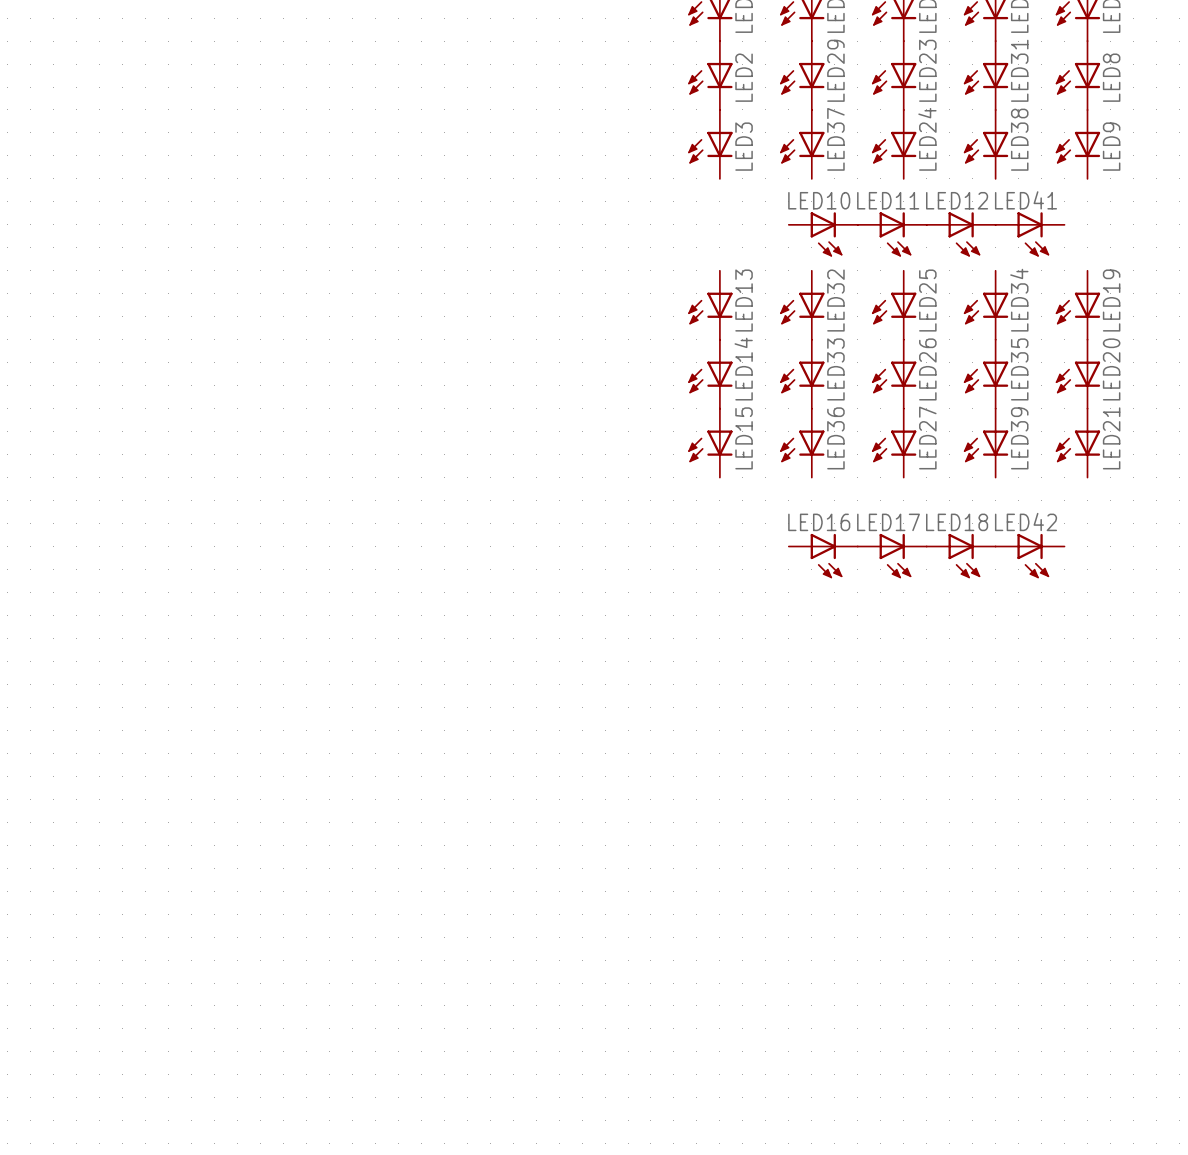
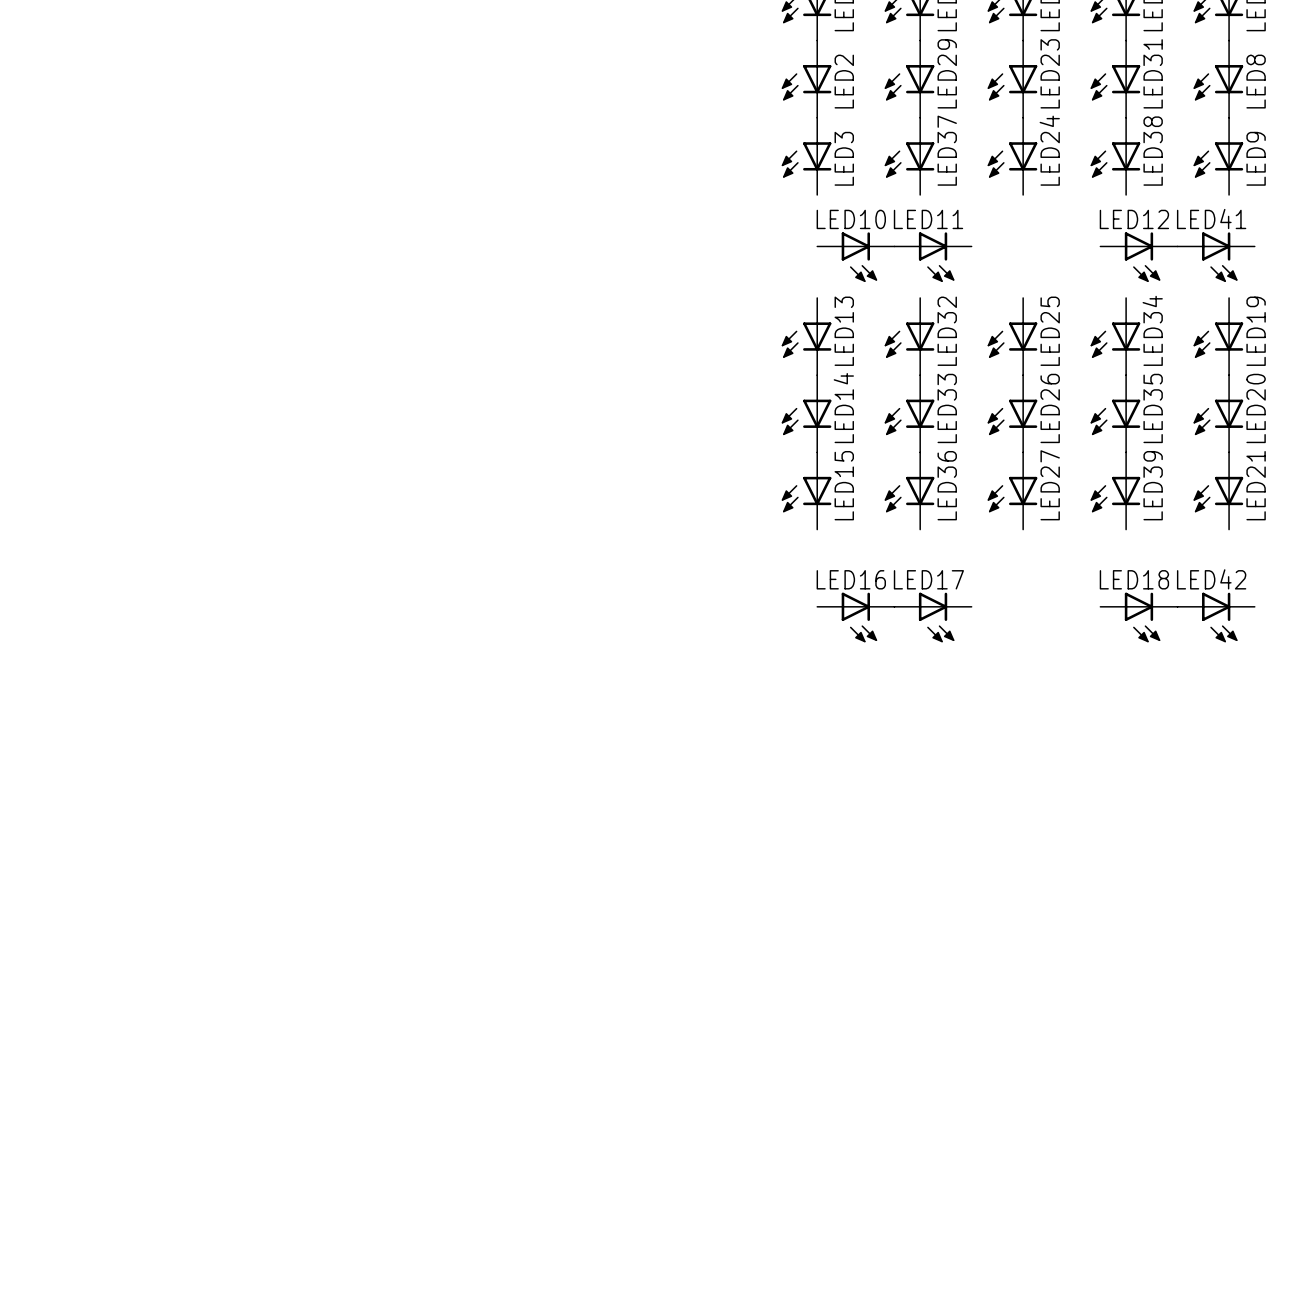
LED10 name: LED10 (819, 200) -> LED11 (928, 219)
LED10: none -> (855, 257)
LED11: (892, 234) -> none
LED12 position: (961, 234) -> (1138, 257)
LED41 position: (1030, 234) -> (1216, 257)
LED16 name: LED16 (819, 522) -> LED17 (928, 579)
LED16: none -> (855, 617)
LED17: (892, 556) -> none
LED18 position: (961, 556) -> (1138, 617)
LED42 position: (1030, 556) -> (1216, 617)

